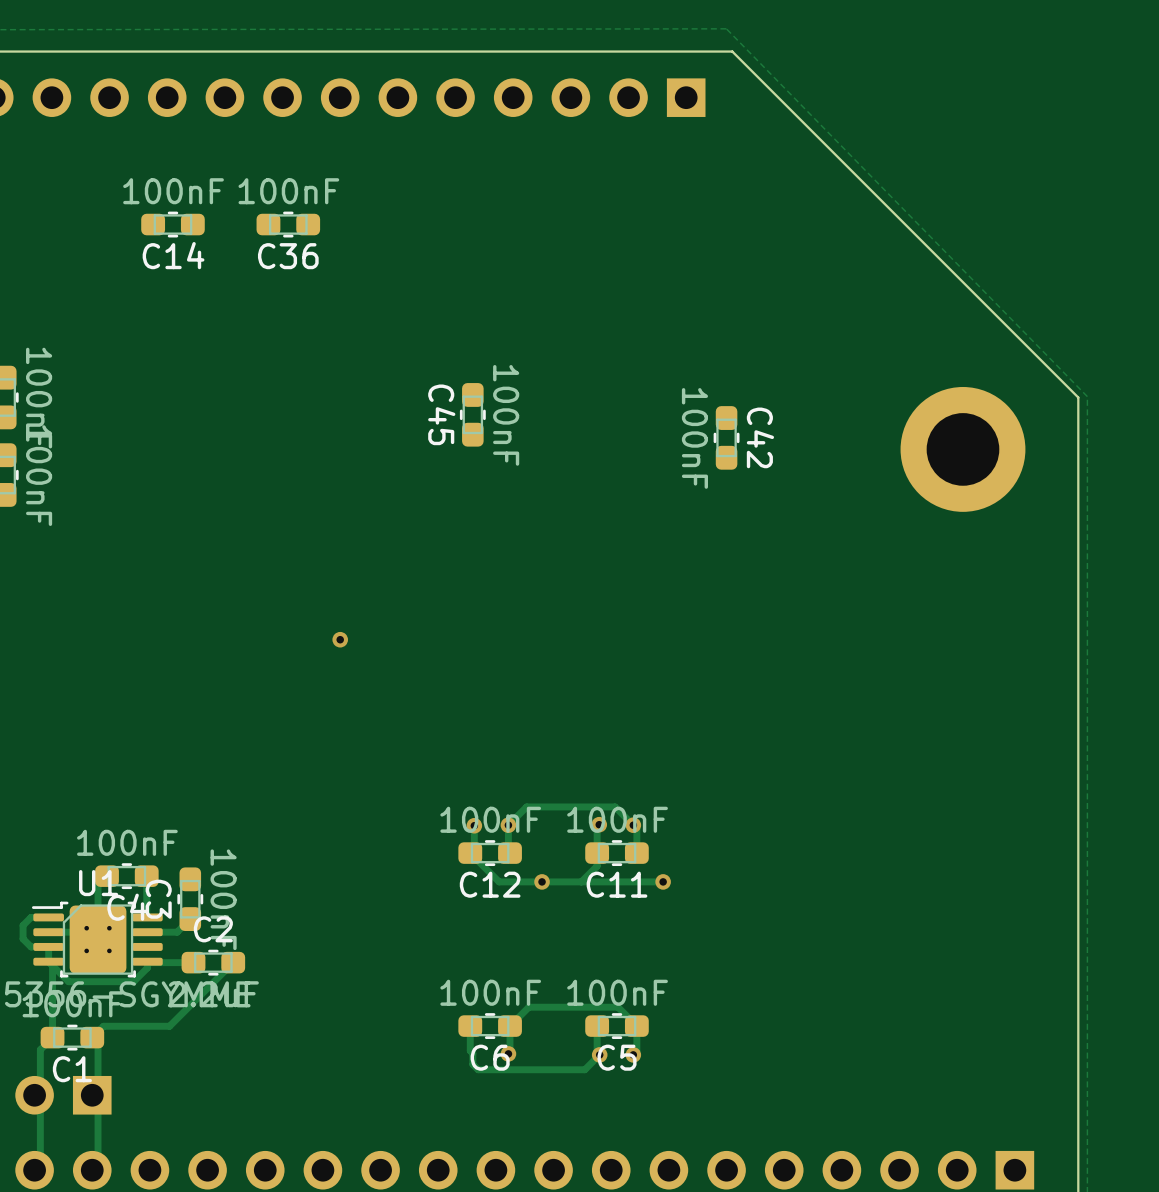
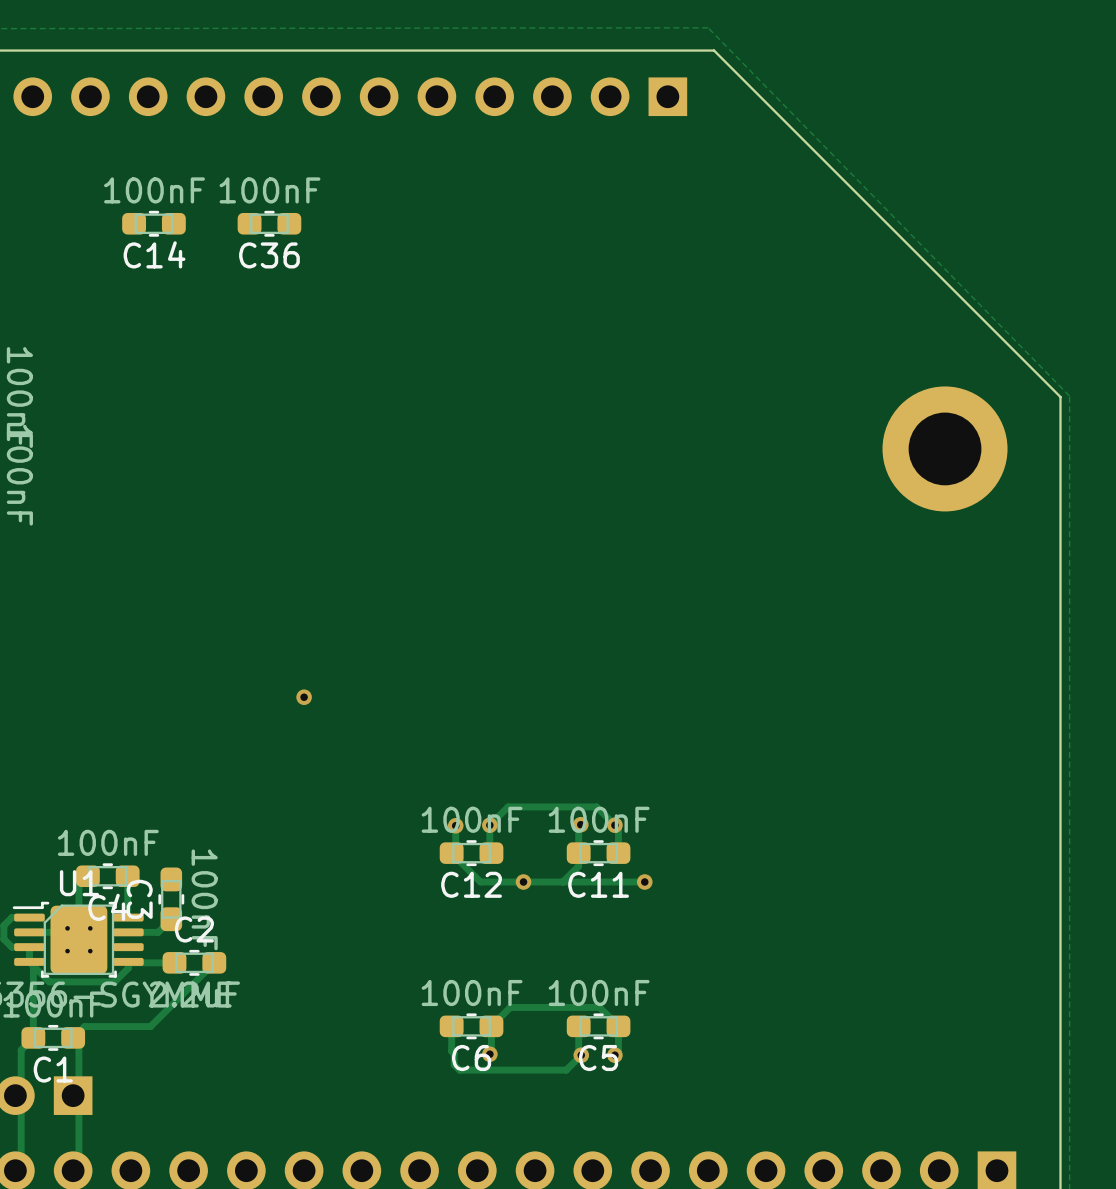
C45: 100nF (472, 414) -> none
C42: 100nF (726, 437) -> none
via position: (340, 639) -> (304, 697)

